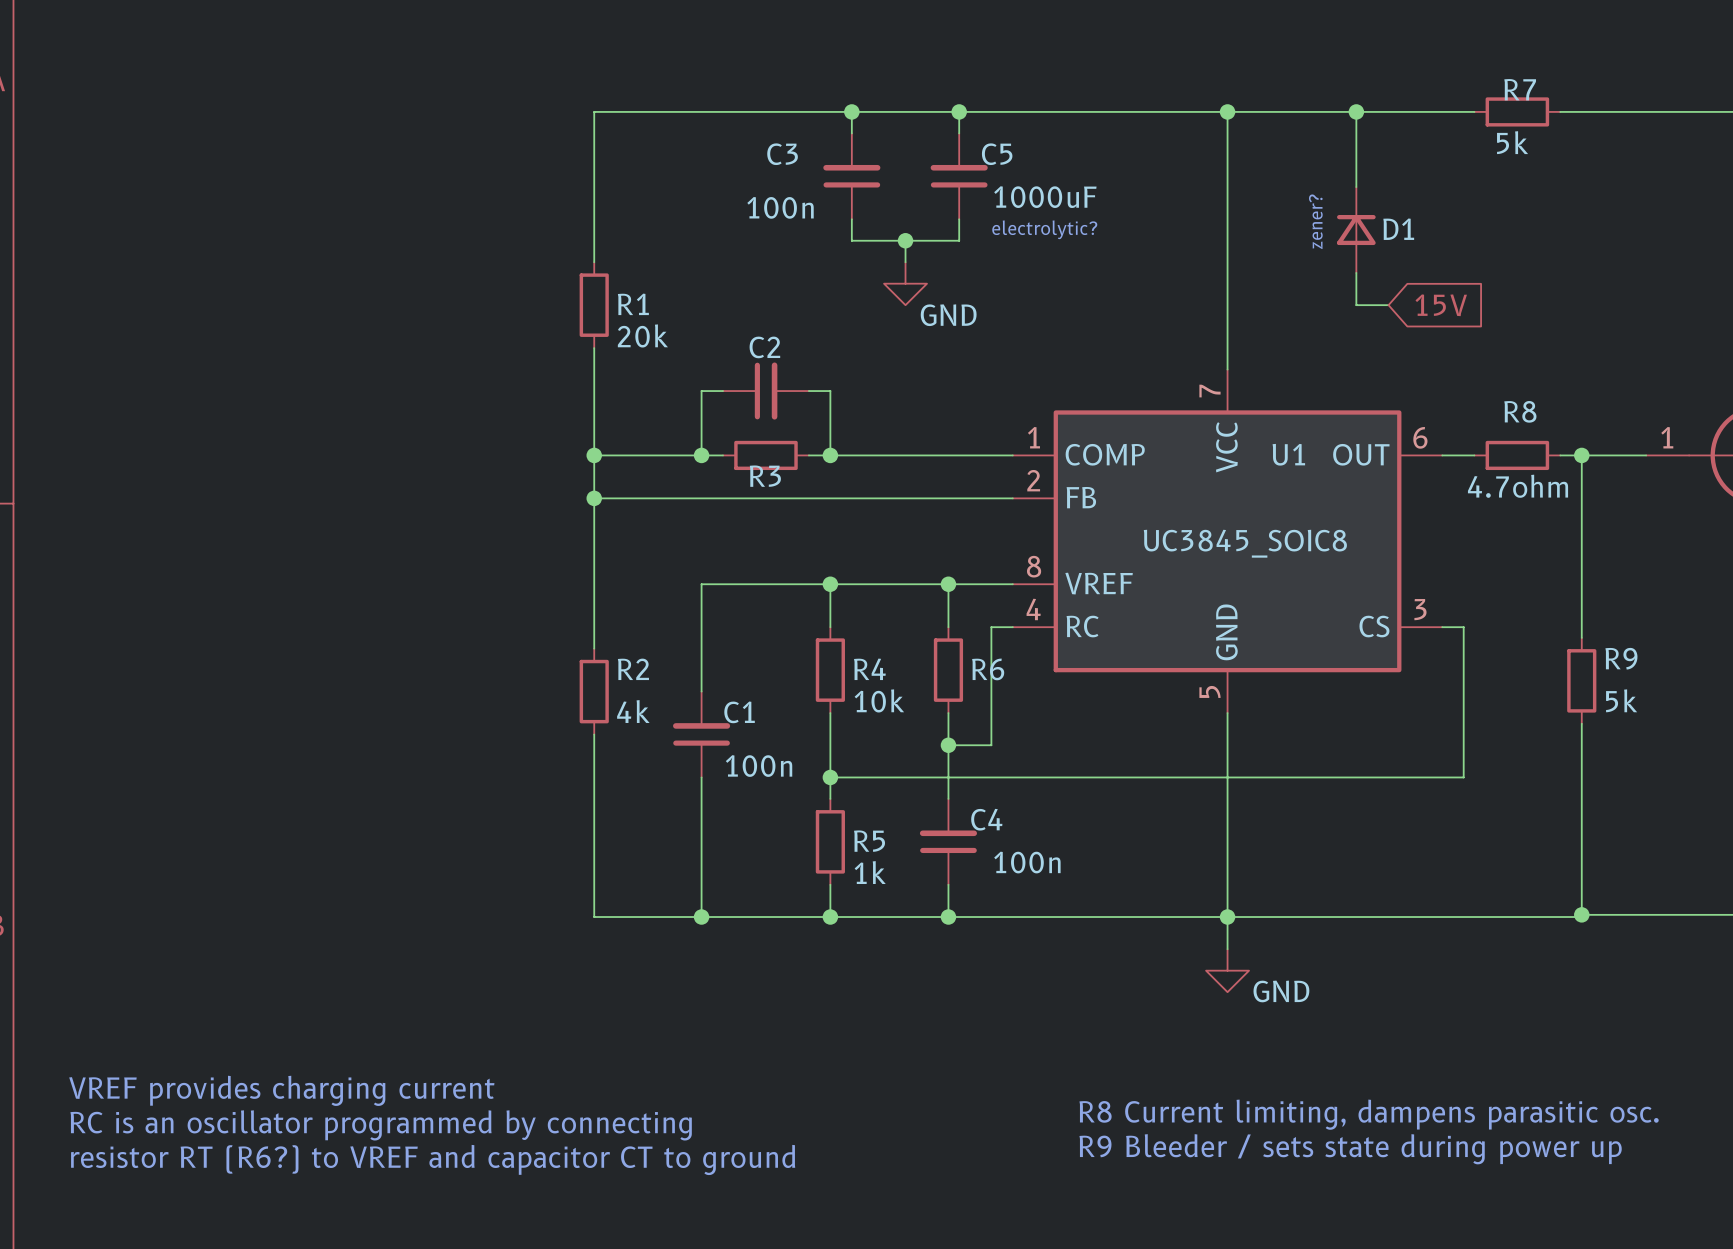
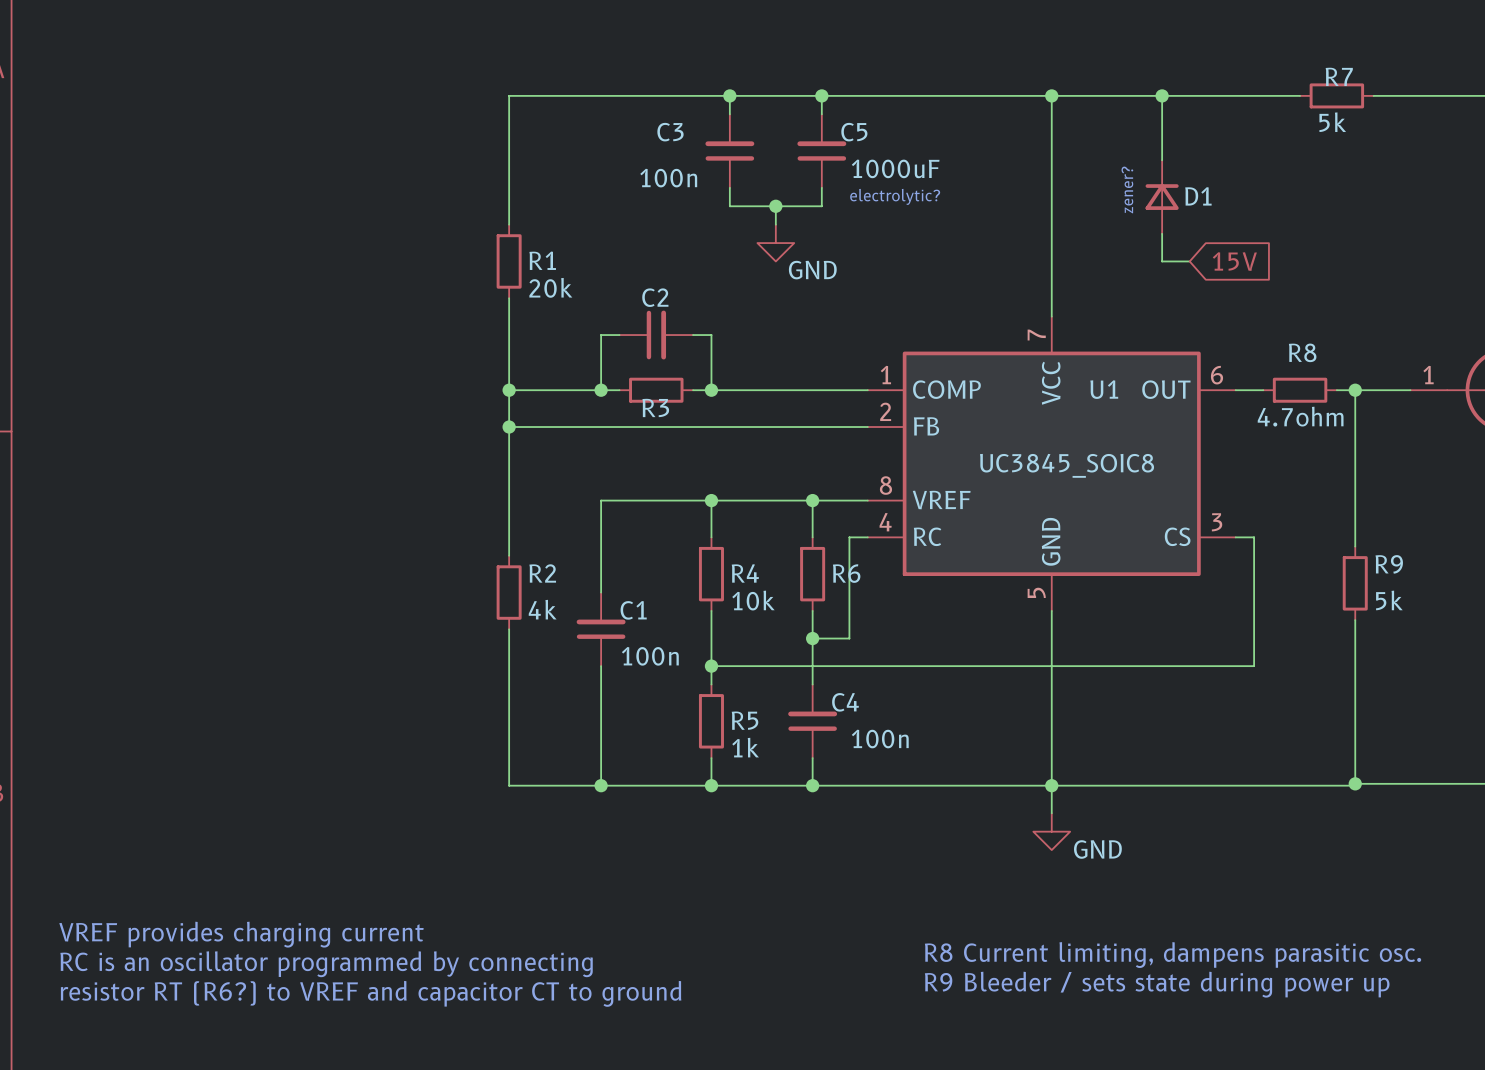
R7 position: (1517, 111) -> (1336, 95)
wire: (1560, 111) (1603, 111) -> (1263, 95) (1300, 95)

